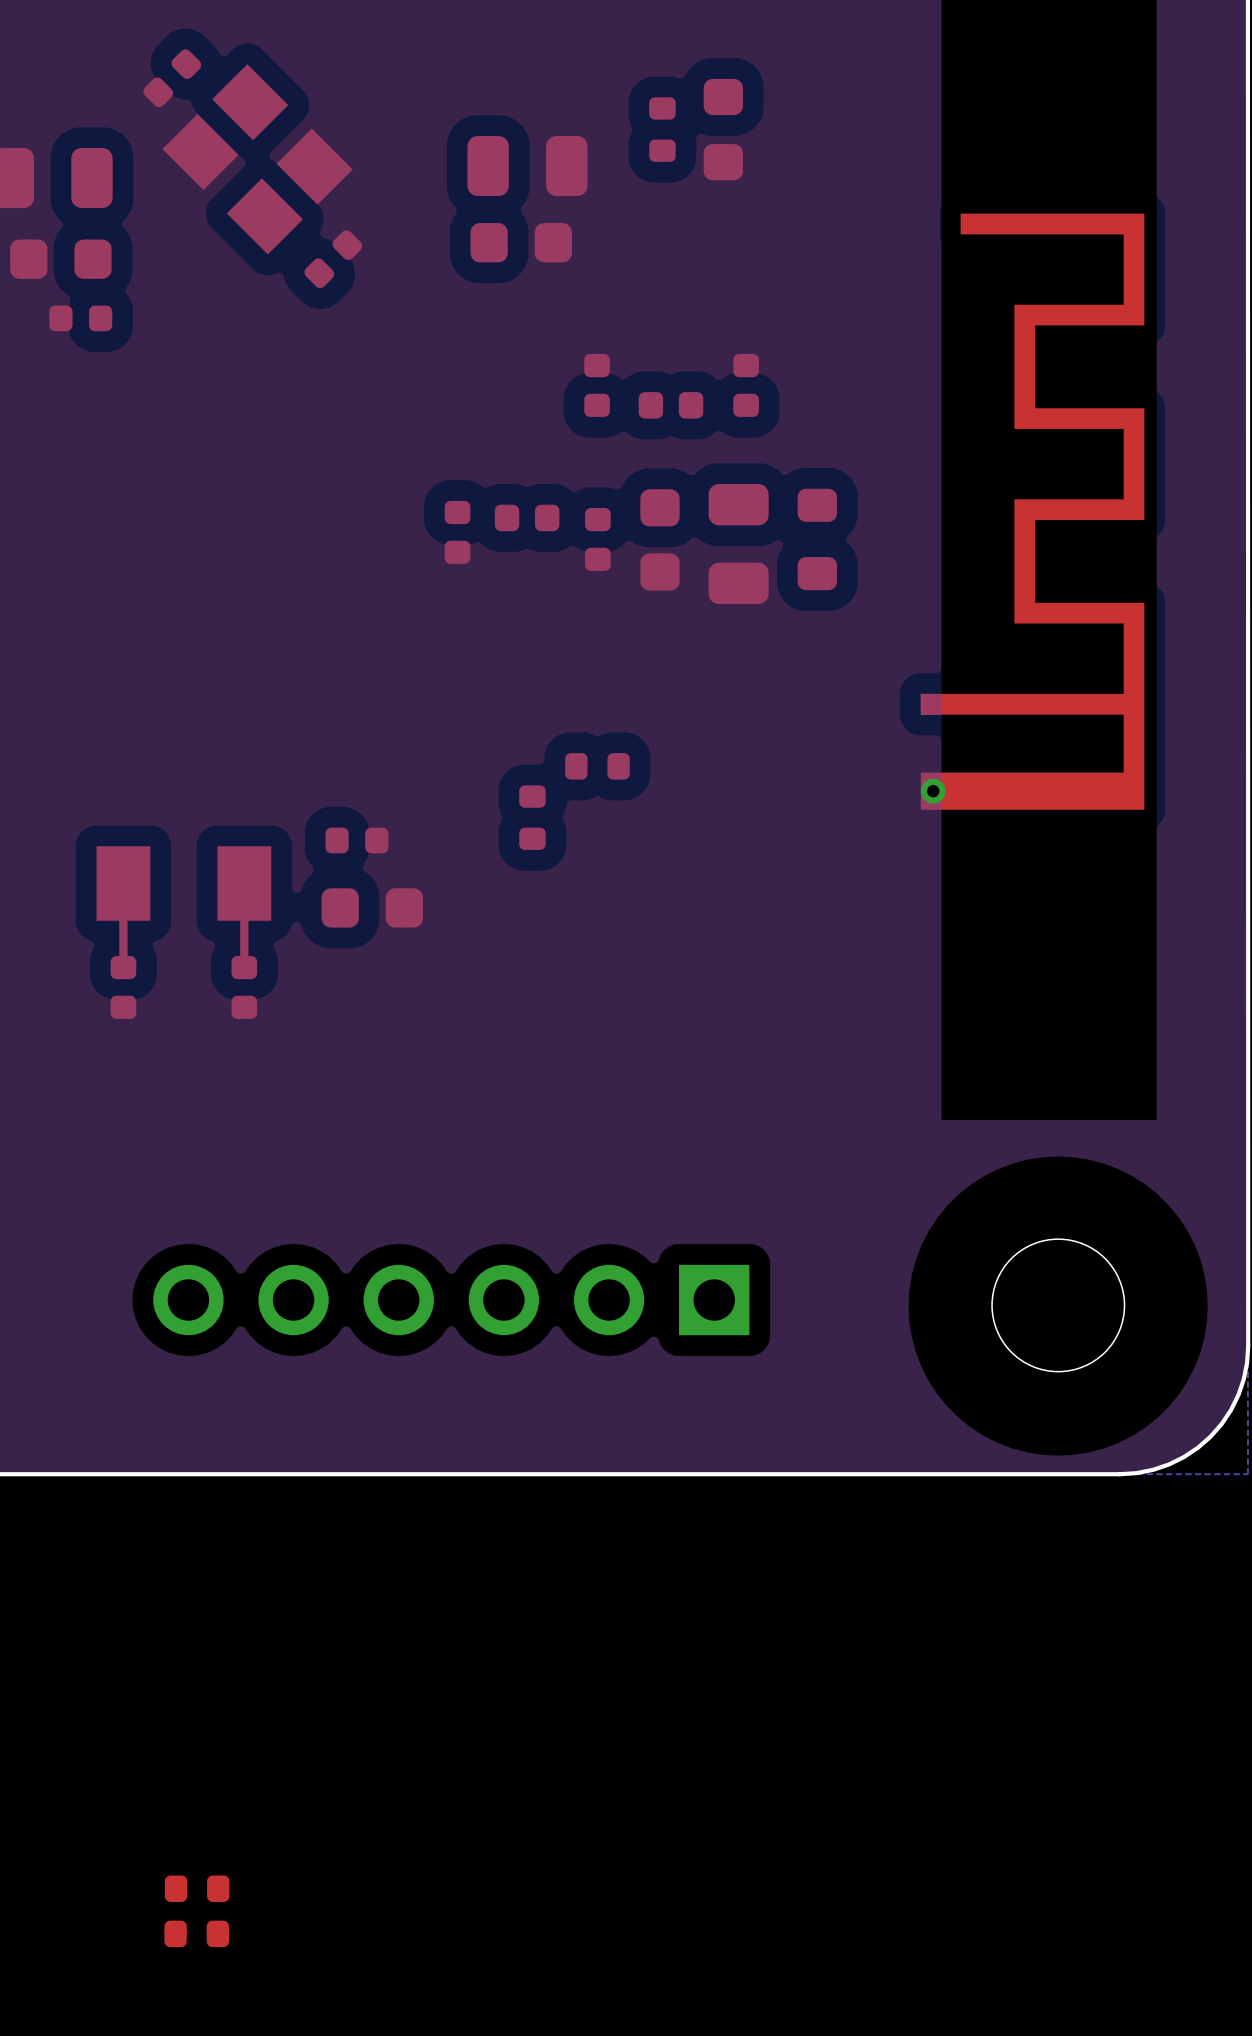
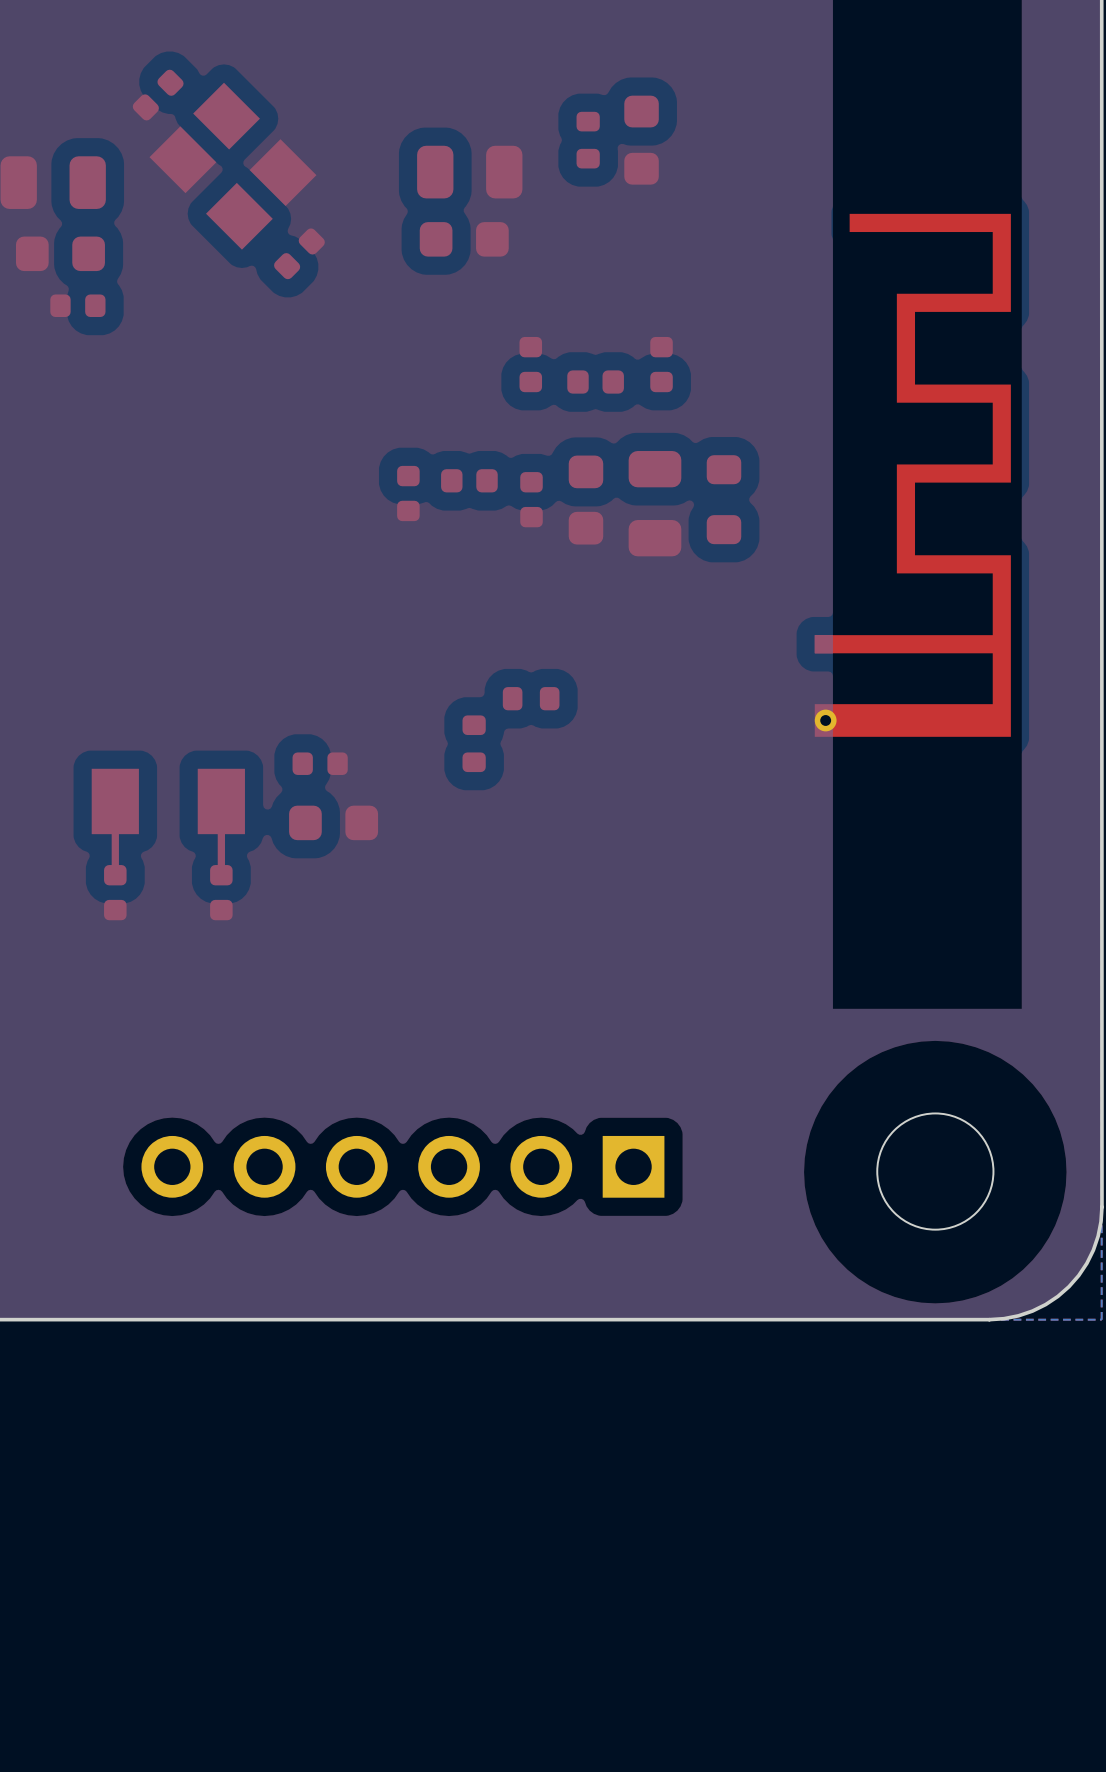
part: (197, 1888) -> none
part: (196, 1933) -> none

